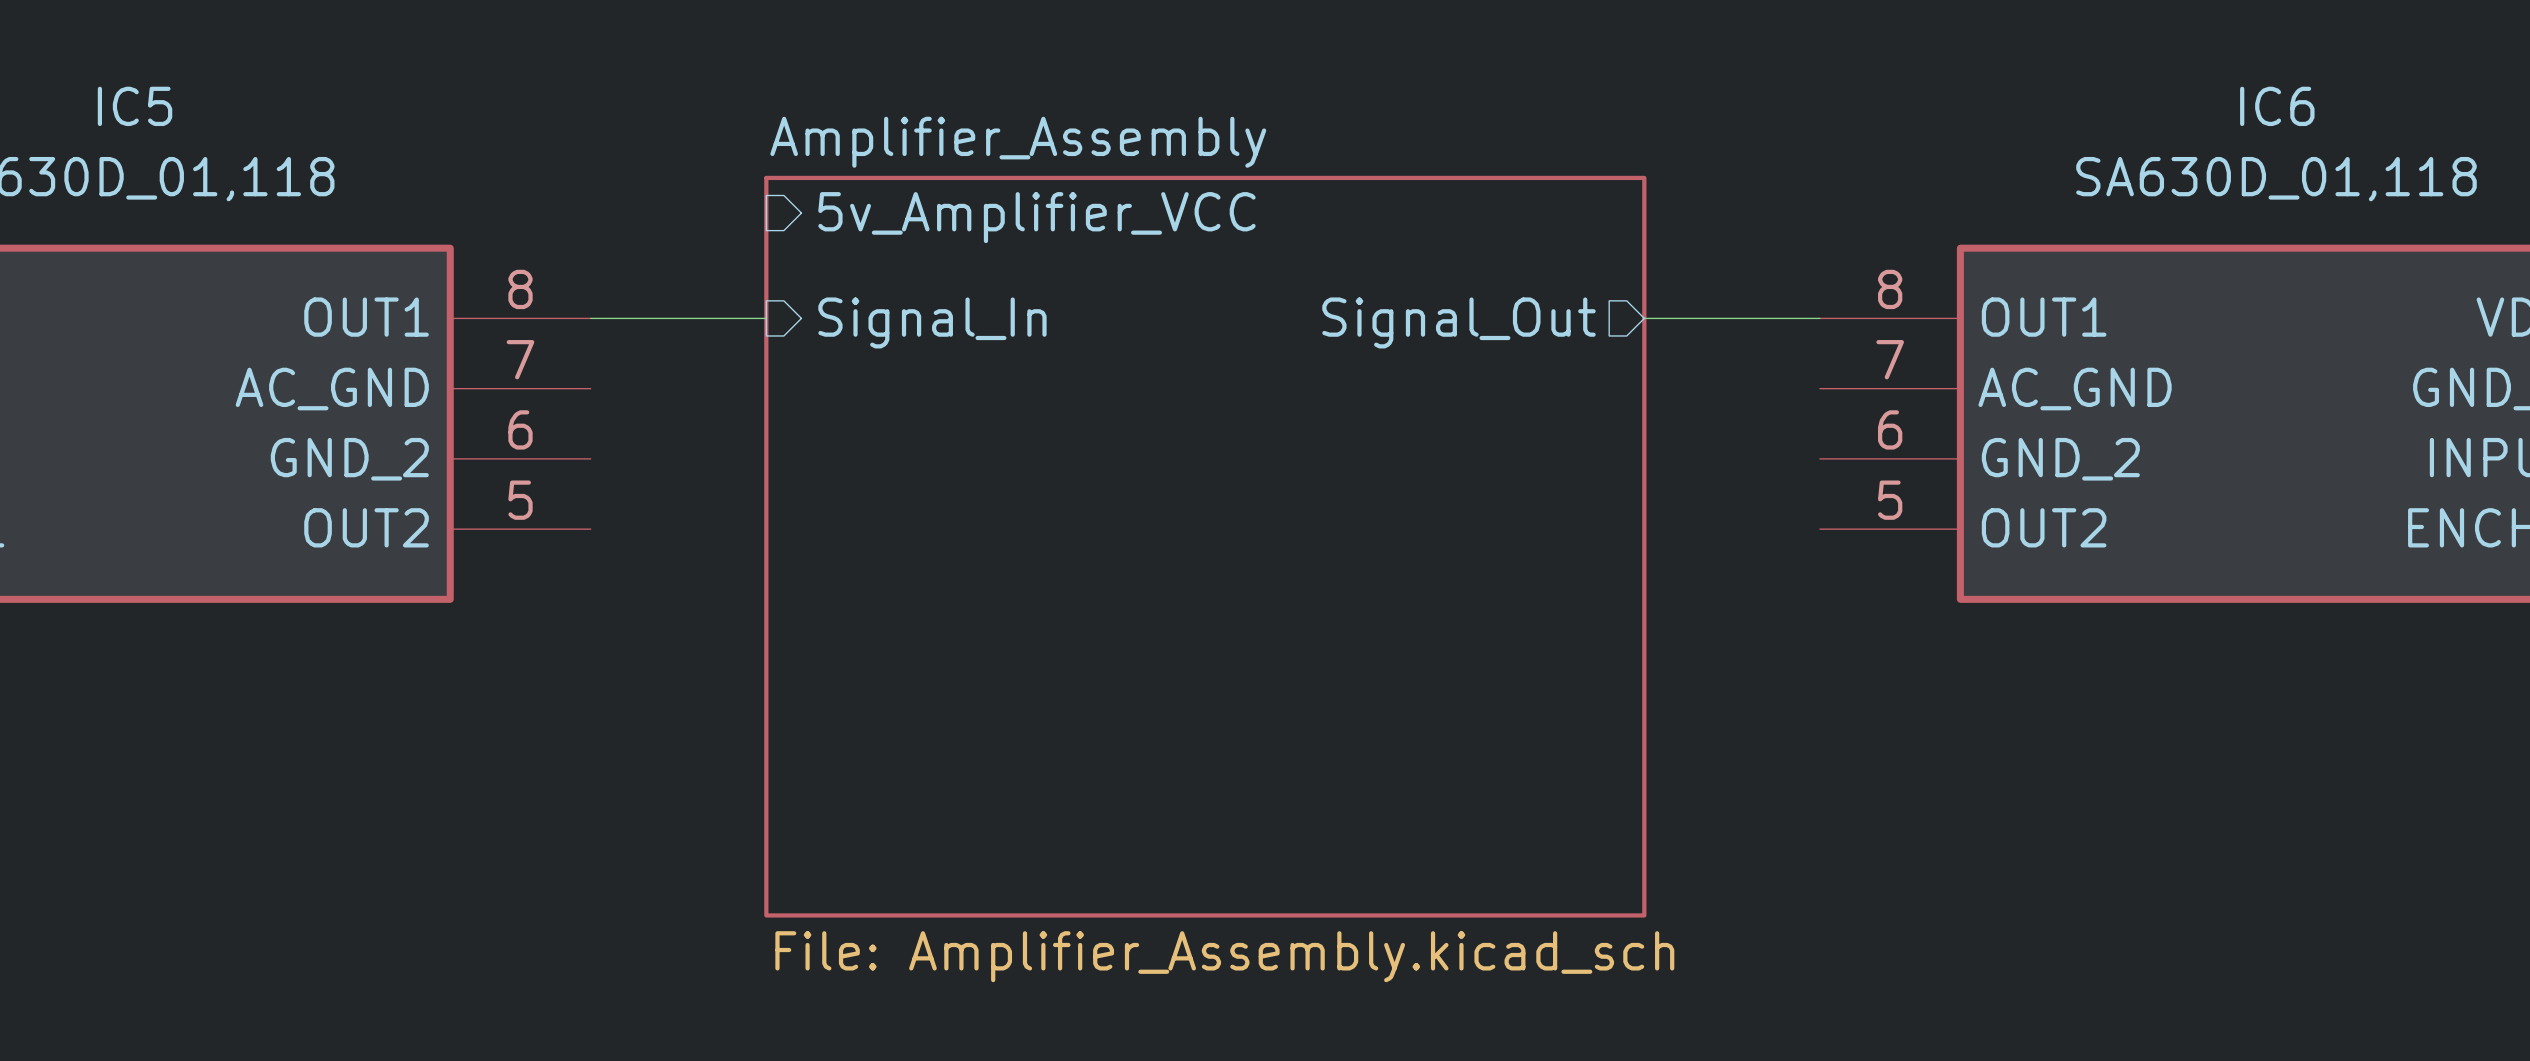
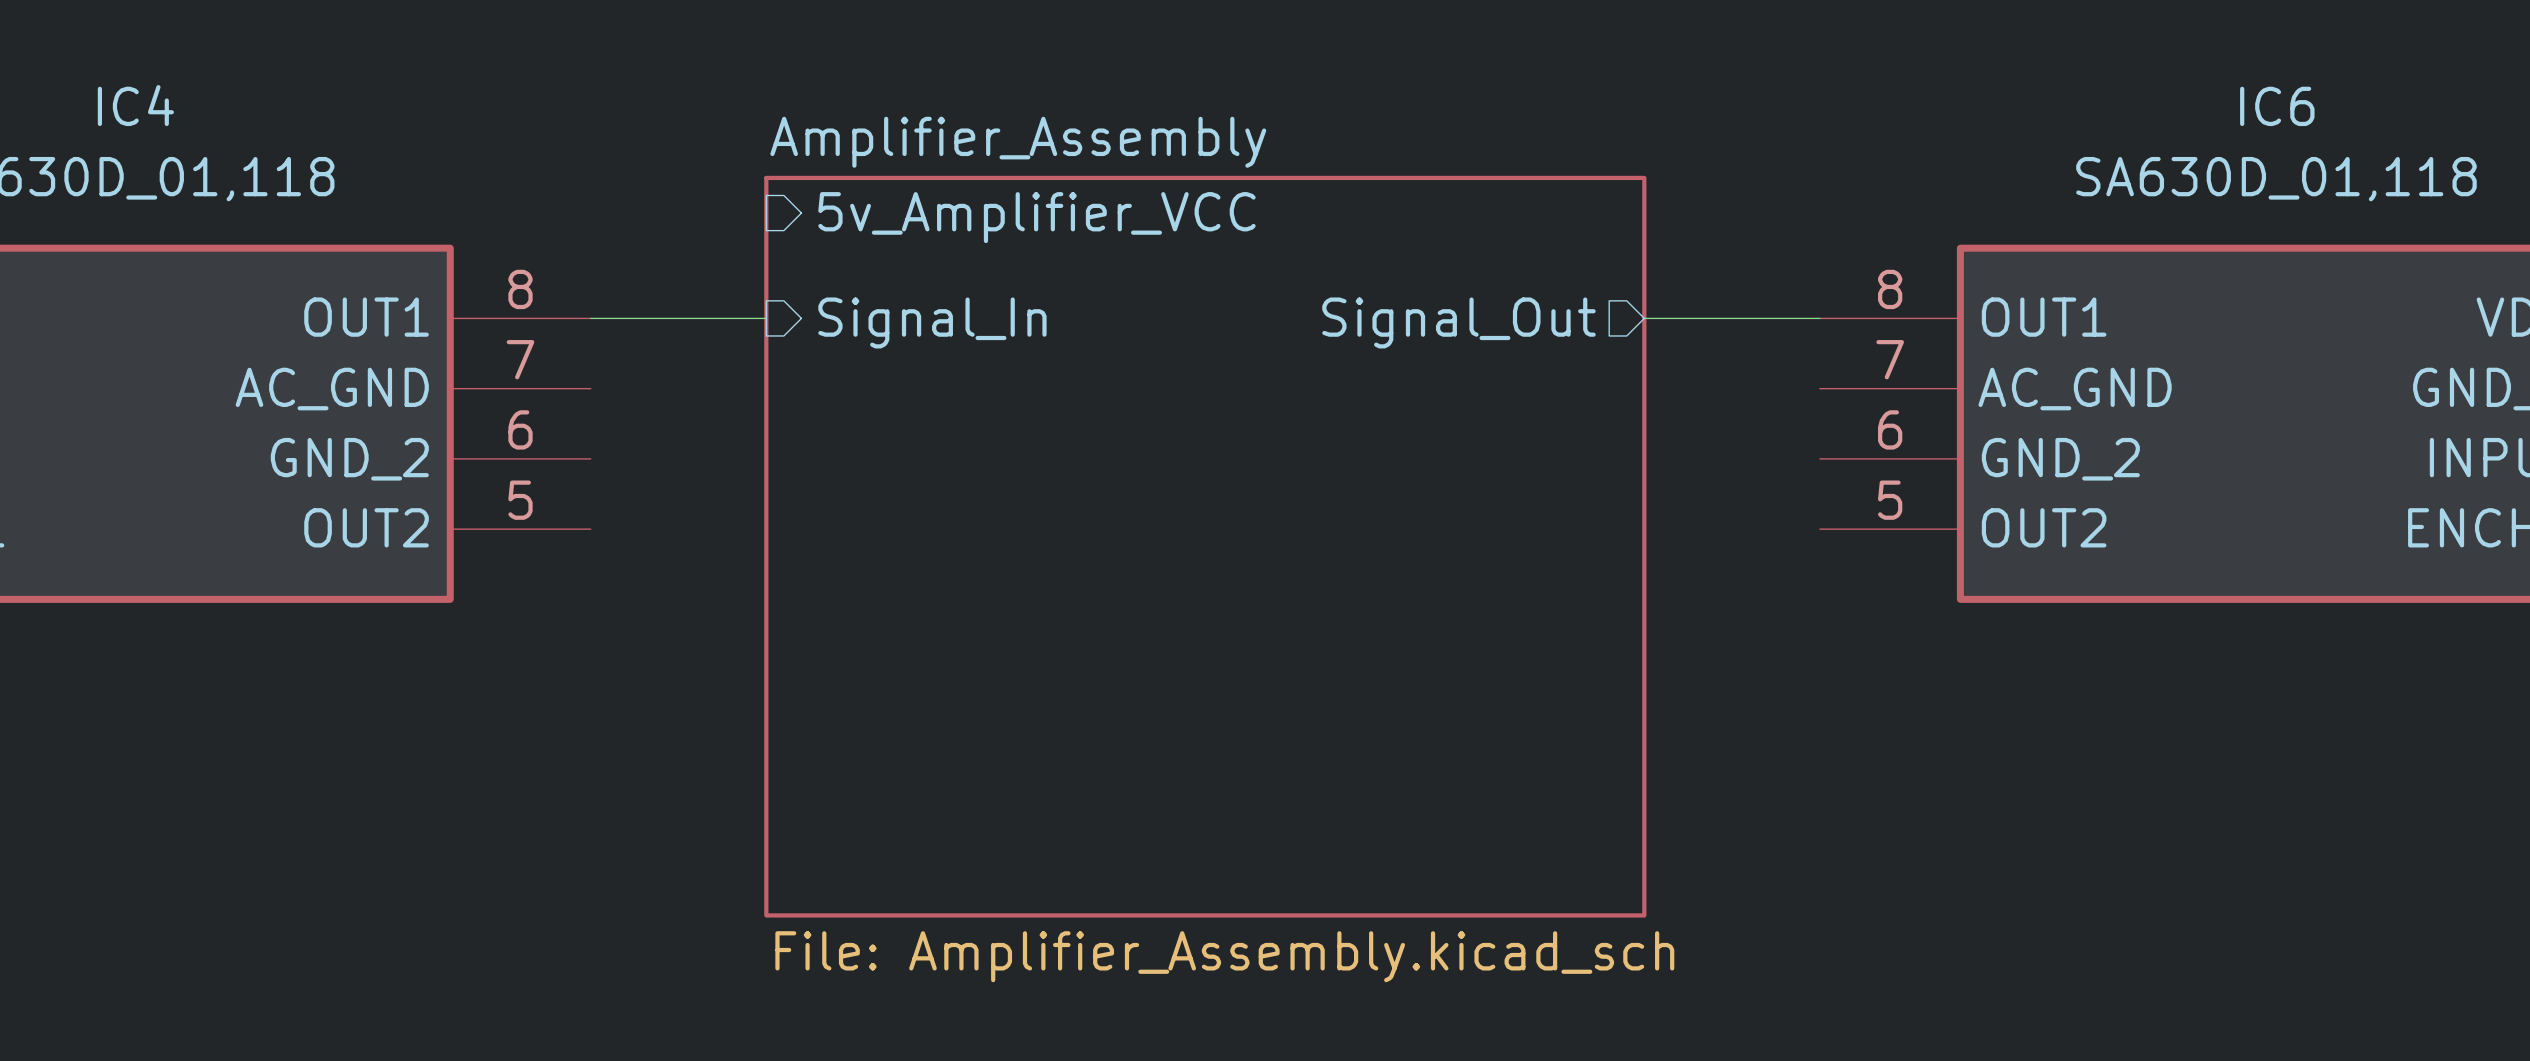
IC5 name: IC5 (135, 106) -> IC4 (135, 105)

